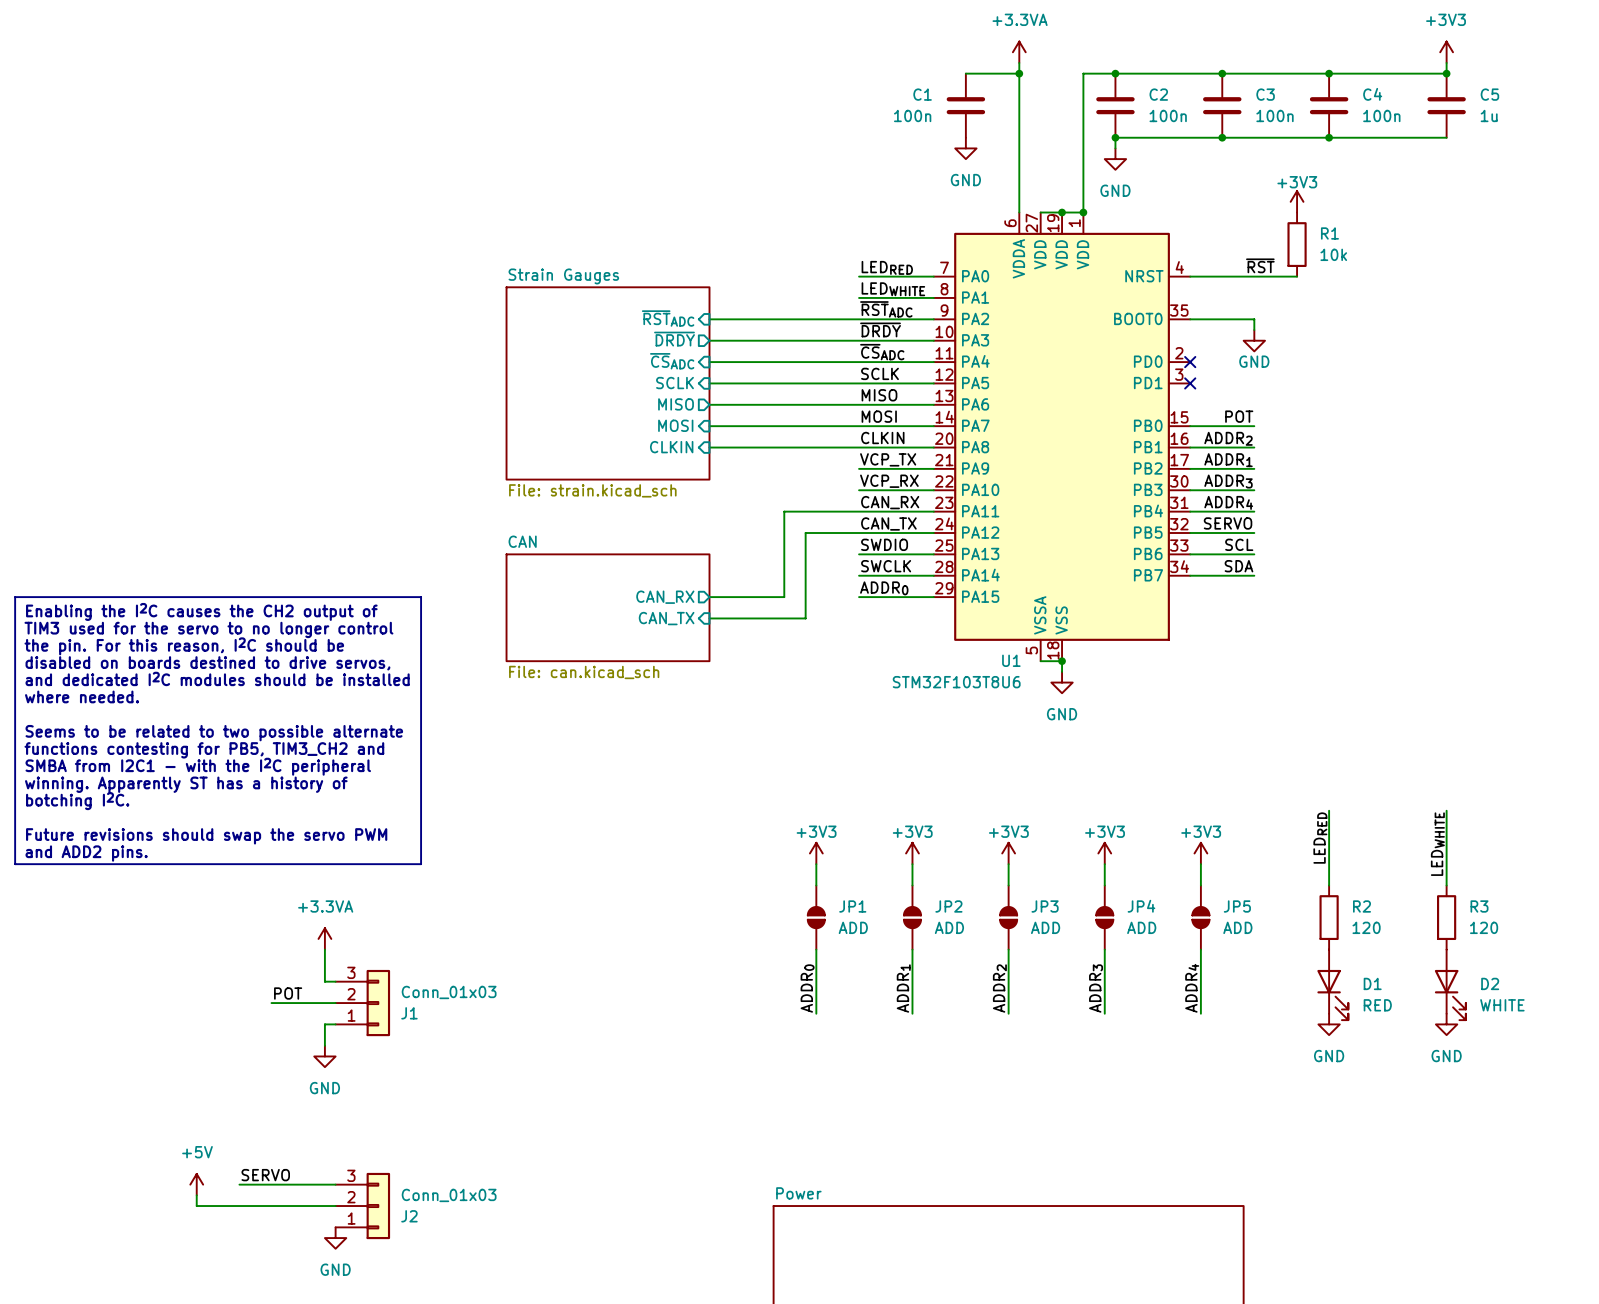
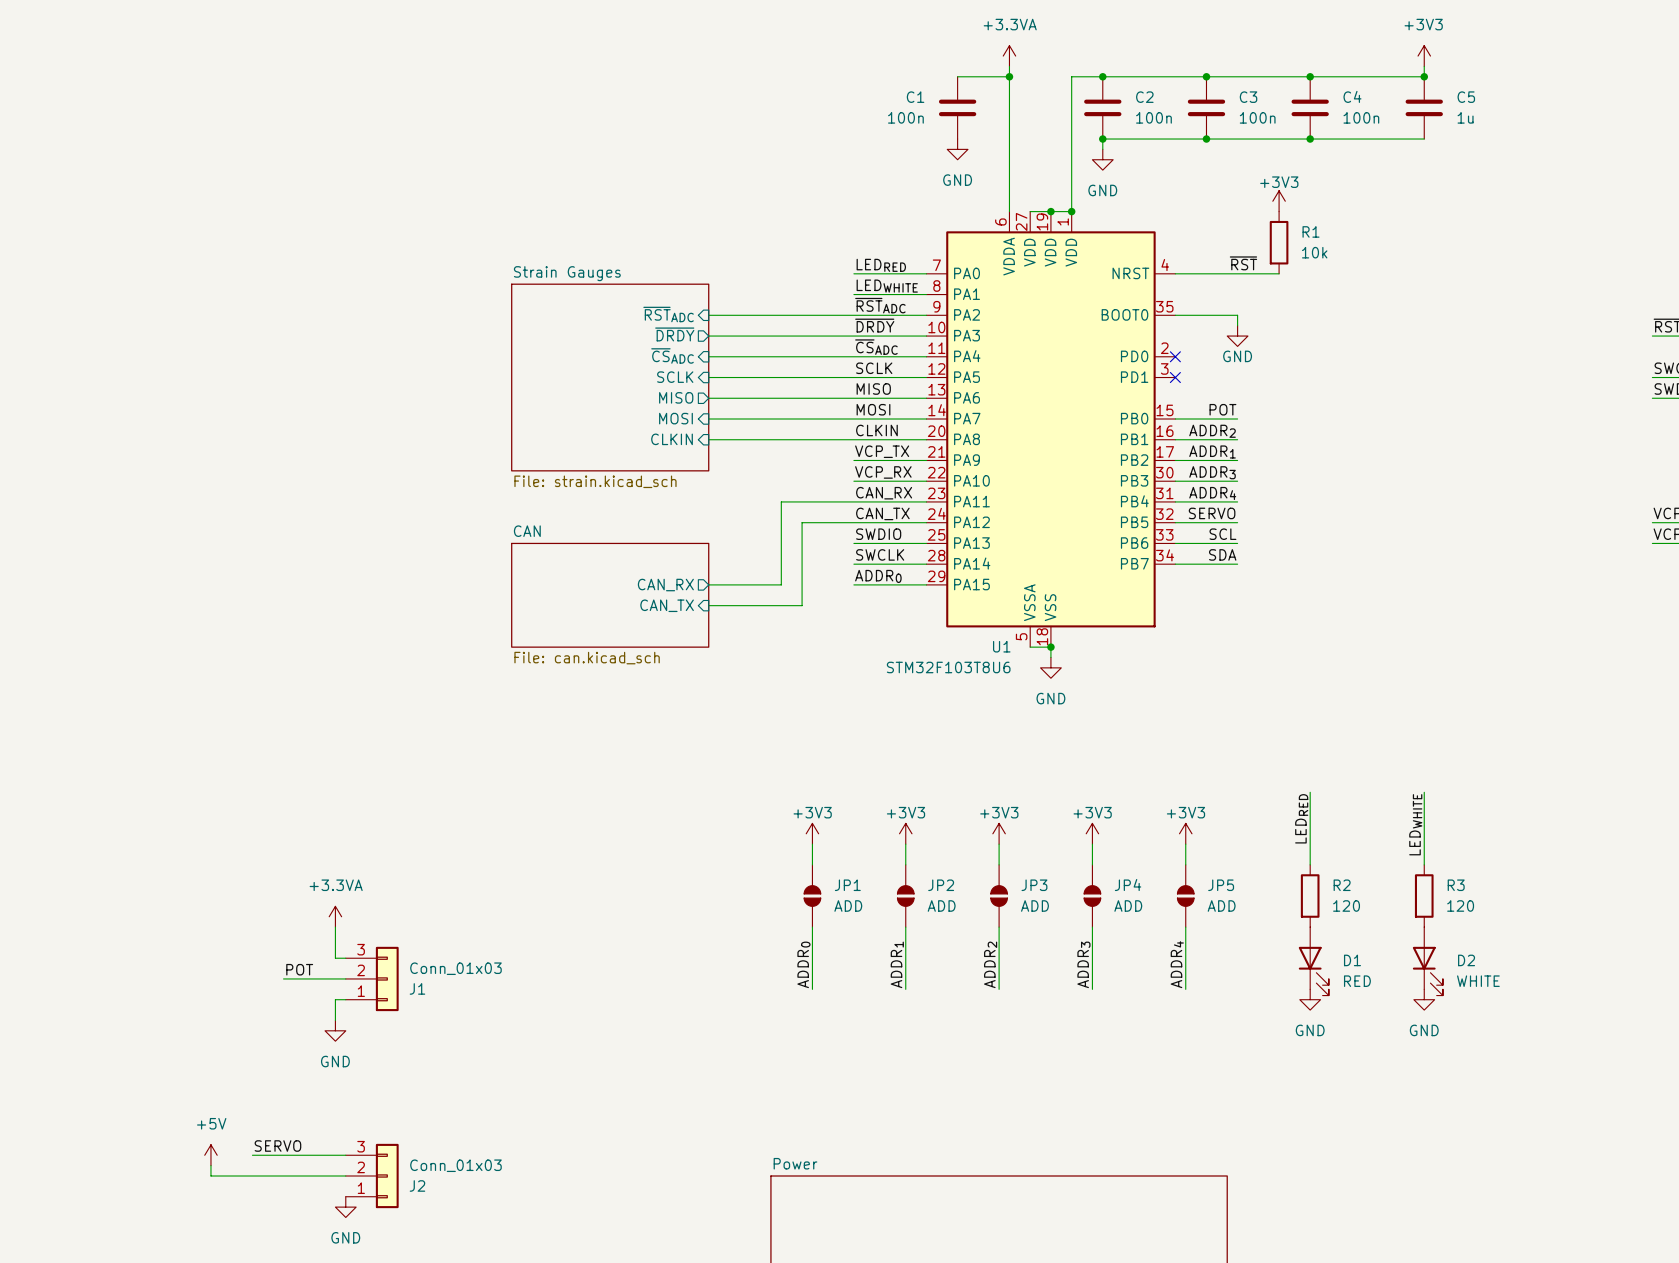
line: (15, 597) (421, 597) (421, 864) (15, 864) (15, 597) -> none
text: Enabling the I2C causes the CH2 output of (201, 611) -> none
text: TIM3 used for the servo to no longer control (208, 629) -> none
text: the pin. For this reason, I2C should be (184, 646) -> none
text: disabled on boards destined to drive servos, (207, 663) -> none
text: and dedicated I2C modules should be installed (217, 678) -> none
text: where needed. (82, 696) -> none
text: Seems to be related to two possible alternate (214, 733) -> none
text: functions contesting for PB5, TIM3_CH2 and (204, 750) -> none
text: SMBA from I2C1 - with the I2C peripheral (198, 766) -> none
text: winning. Apparently ST has a history of (186, 784) -> none
text: botching I2C. (77, 801) -> none
text: Future revisions should swap the servo PWM (206, 836) -> none
text: and ADD2 pins. (86, 853) -> none

